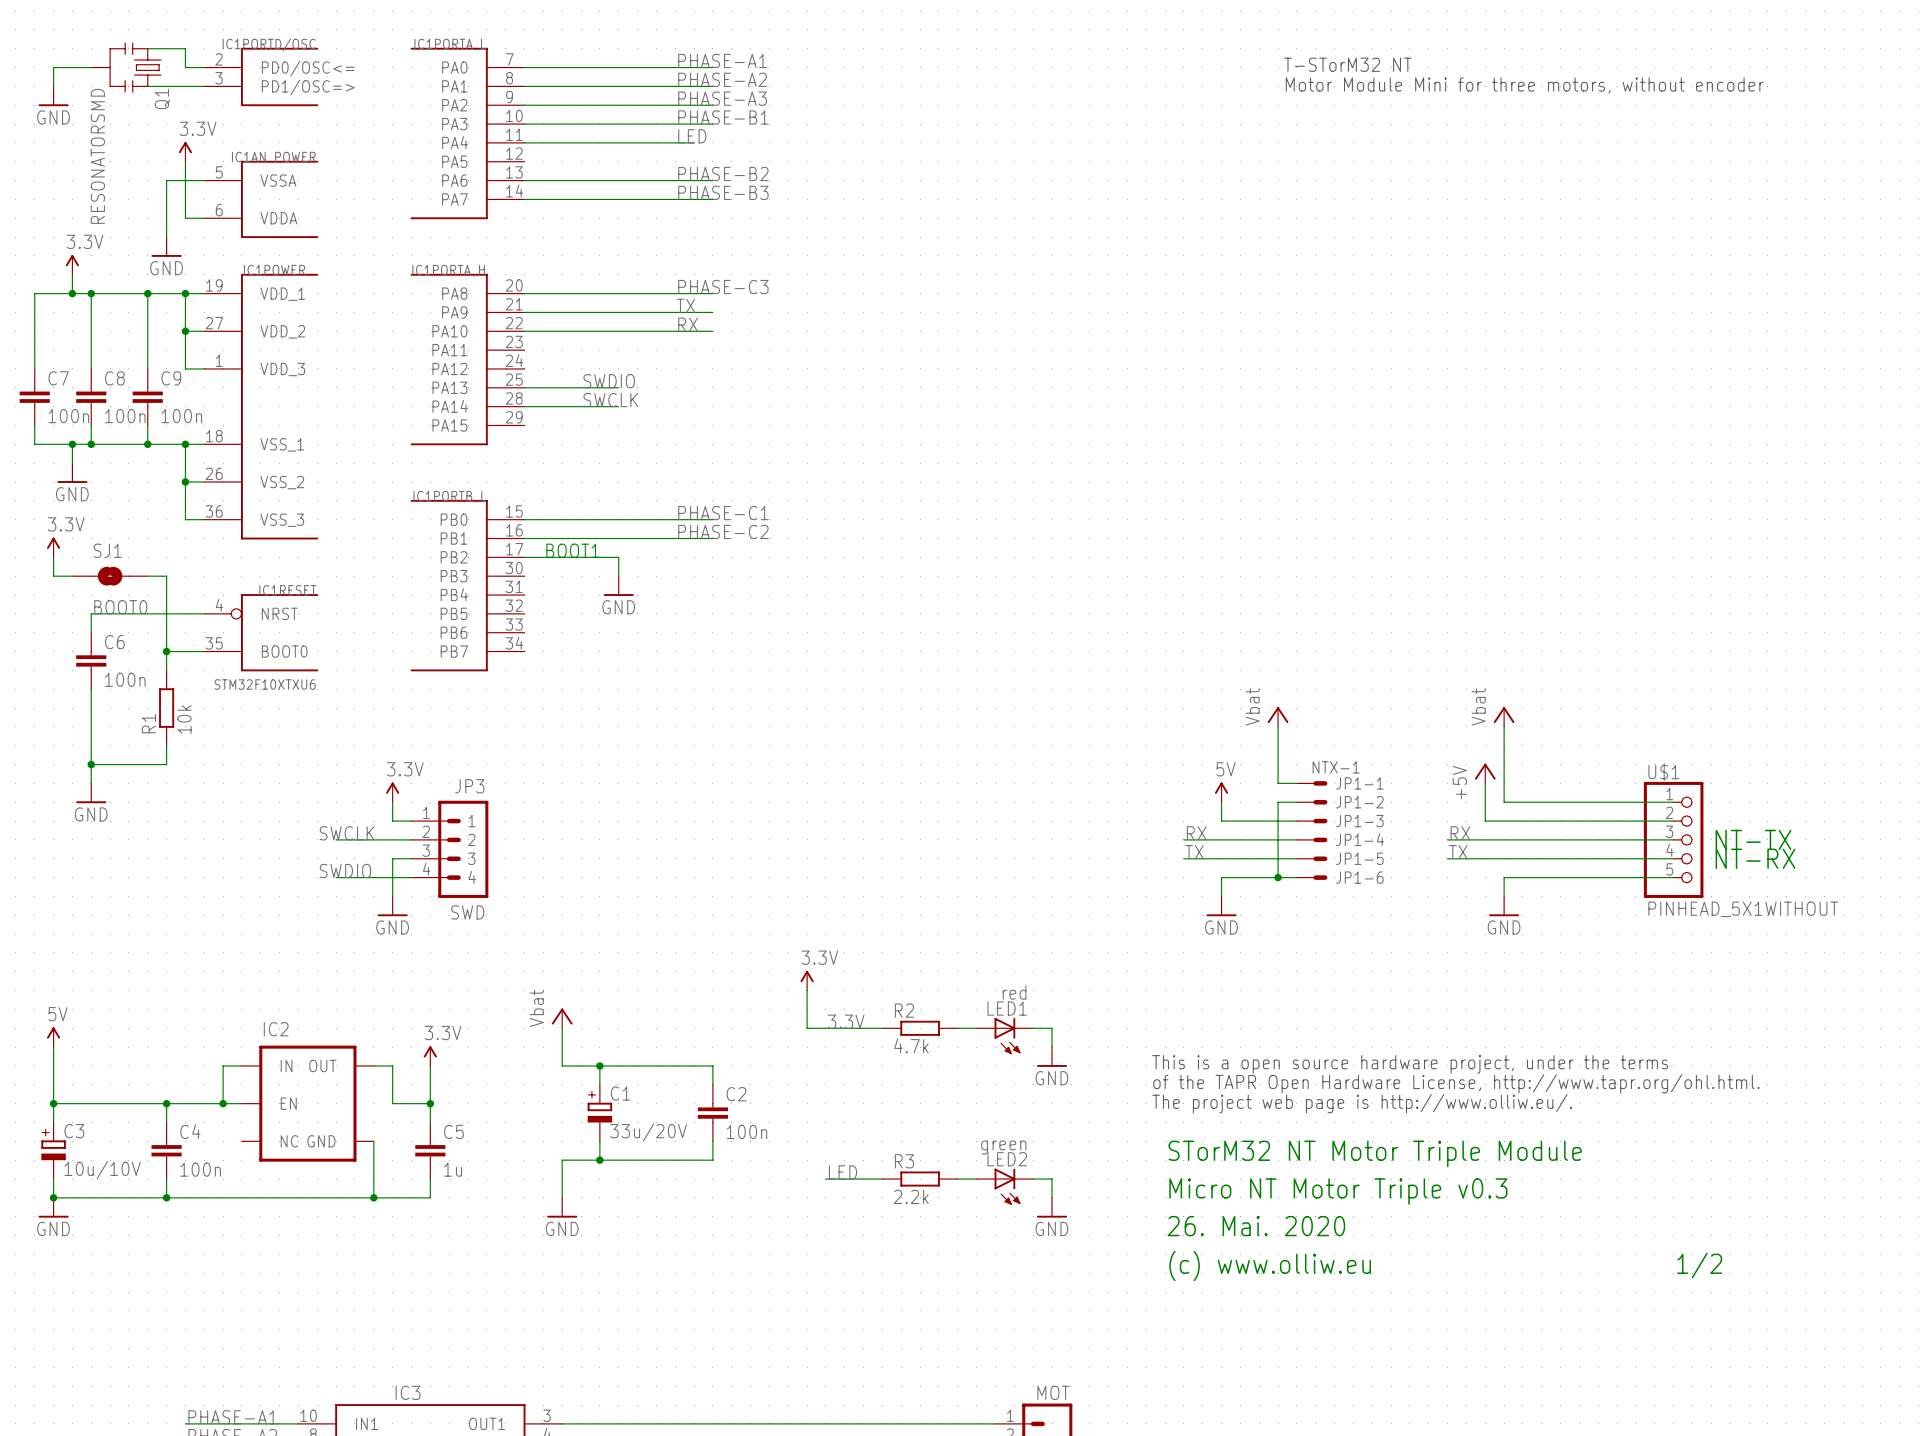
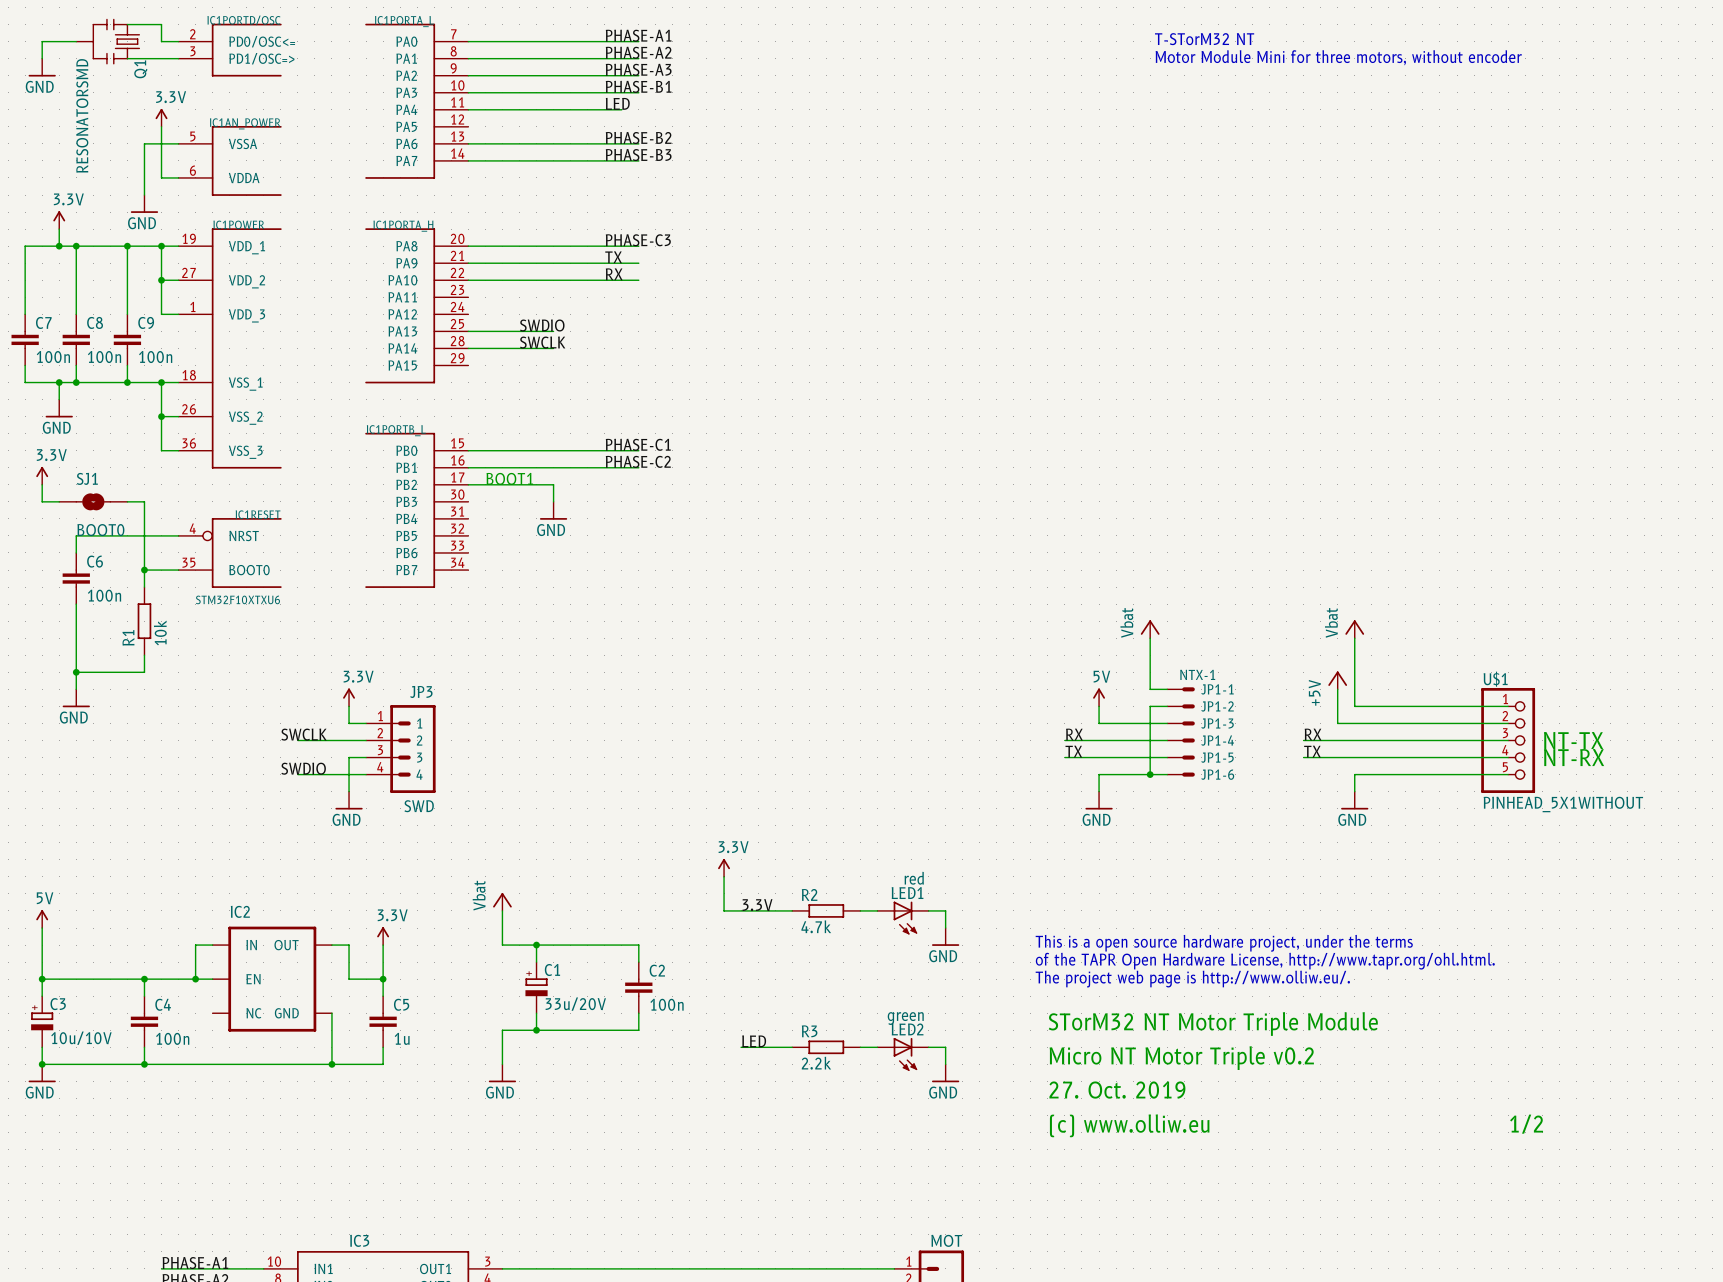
text: Micro NT Motor Triple v0.3 (1338, 1191) -> Micro NT Motor Triple v0.2 (1181, 1058)
text: 26. Mai. 2020 (1256, 1226) -> 27. Oct. 2019 (1117, 1090)

